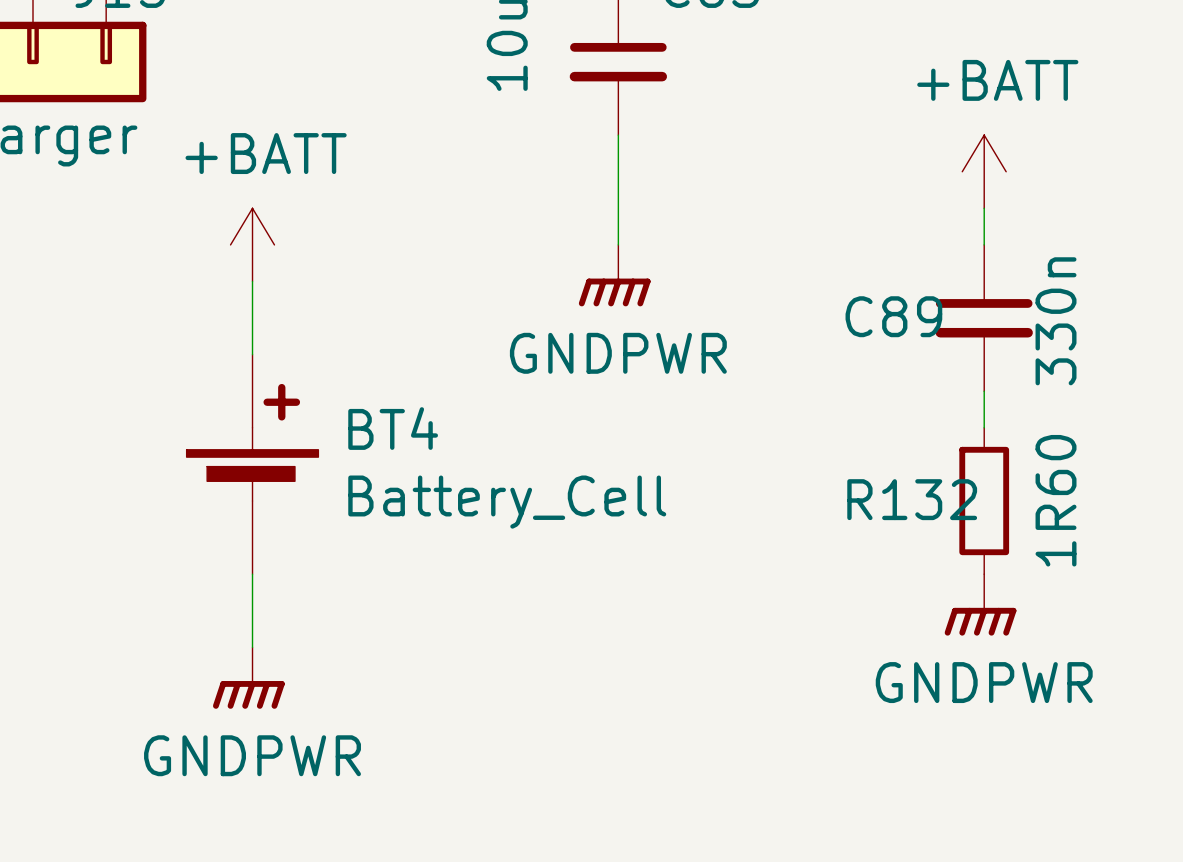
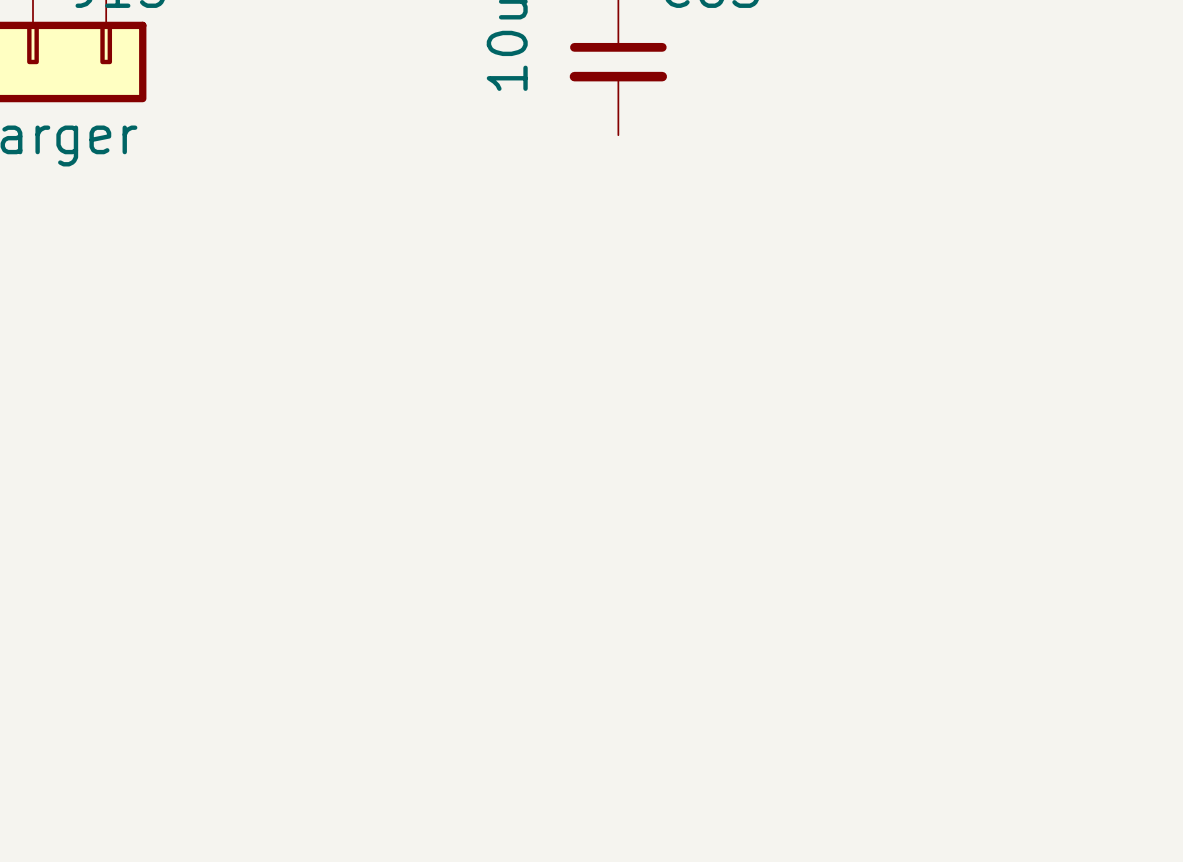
wire: (618, 135) (618, 244) -> none
power symbol: +BATT (984, 171) -> none
wire: (984, 208) (984, 244) -> none
power symbol: +BATT (252, 244) -> none
power symbol: GNDPWR (614, 275) -> none
wire: (252, 281) (252, 354) -> none
C89: 330n (984, 318) -> none
wire: (984, 391) (984, 427) -> none
BT4: Battery_Cell (252, 464) -> none
R132: 1R60 (984, 501) -> none
wire: (252, 574) (252, 647) -> none
power symbol: GNDPWR (980, 604) -> none
power symbol: GNDPWR (248, 678) -> none

